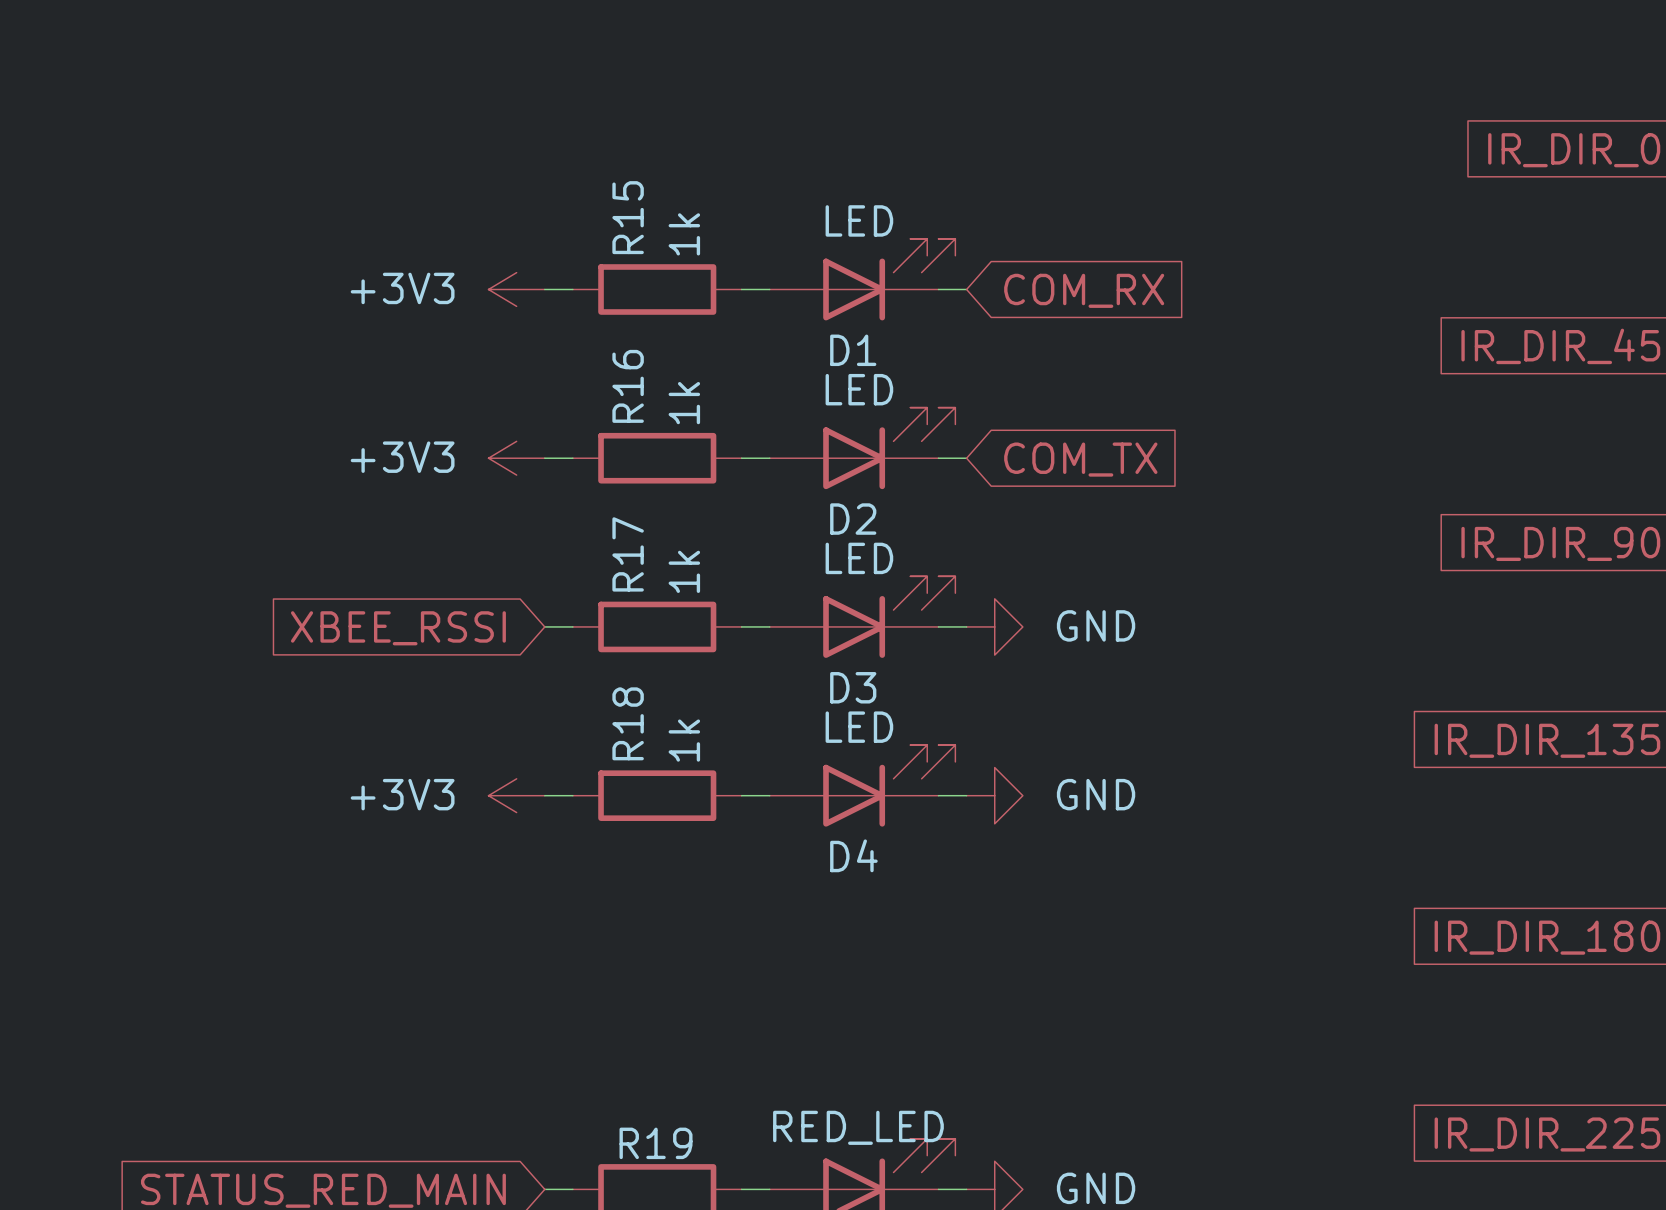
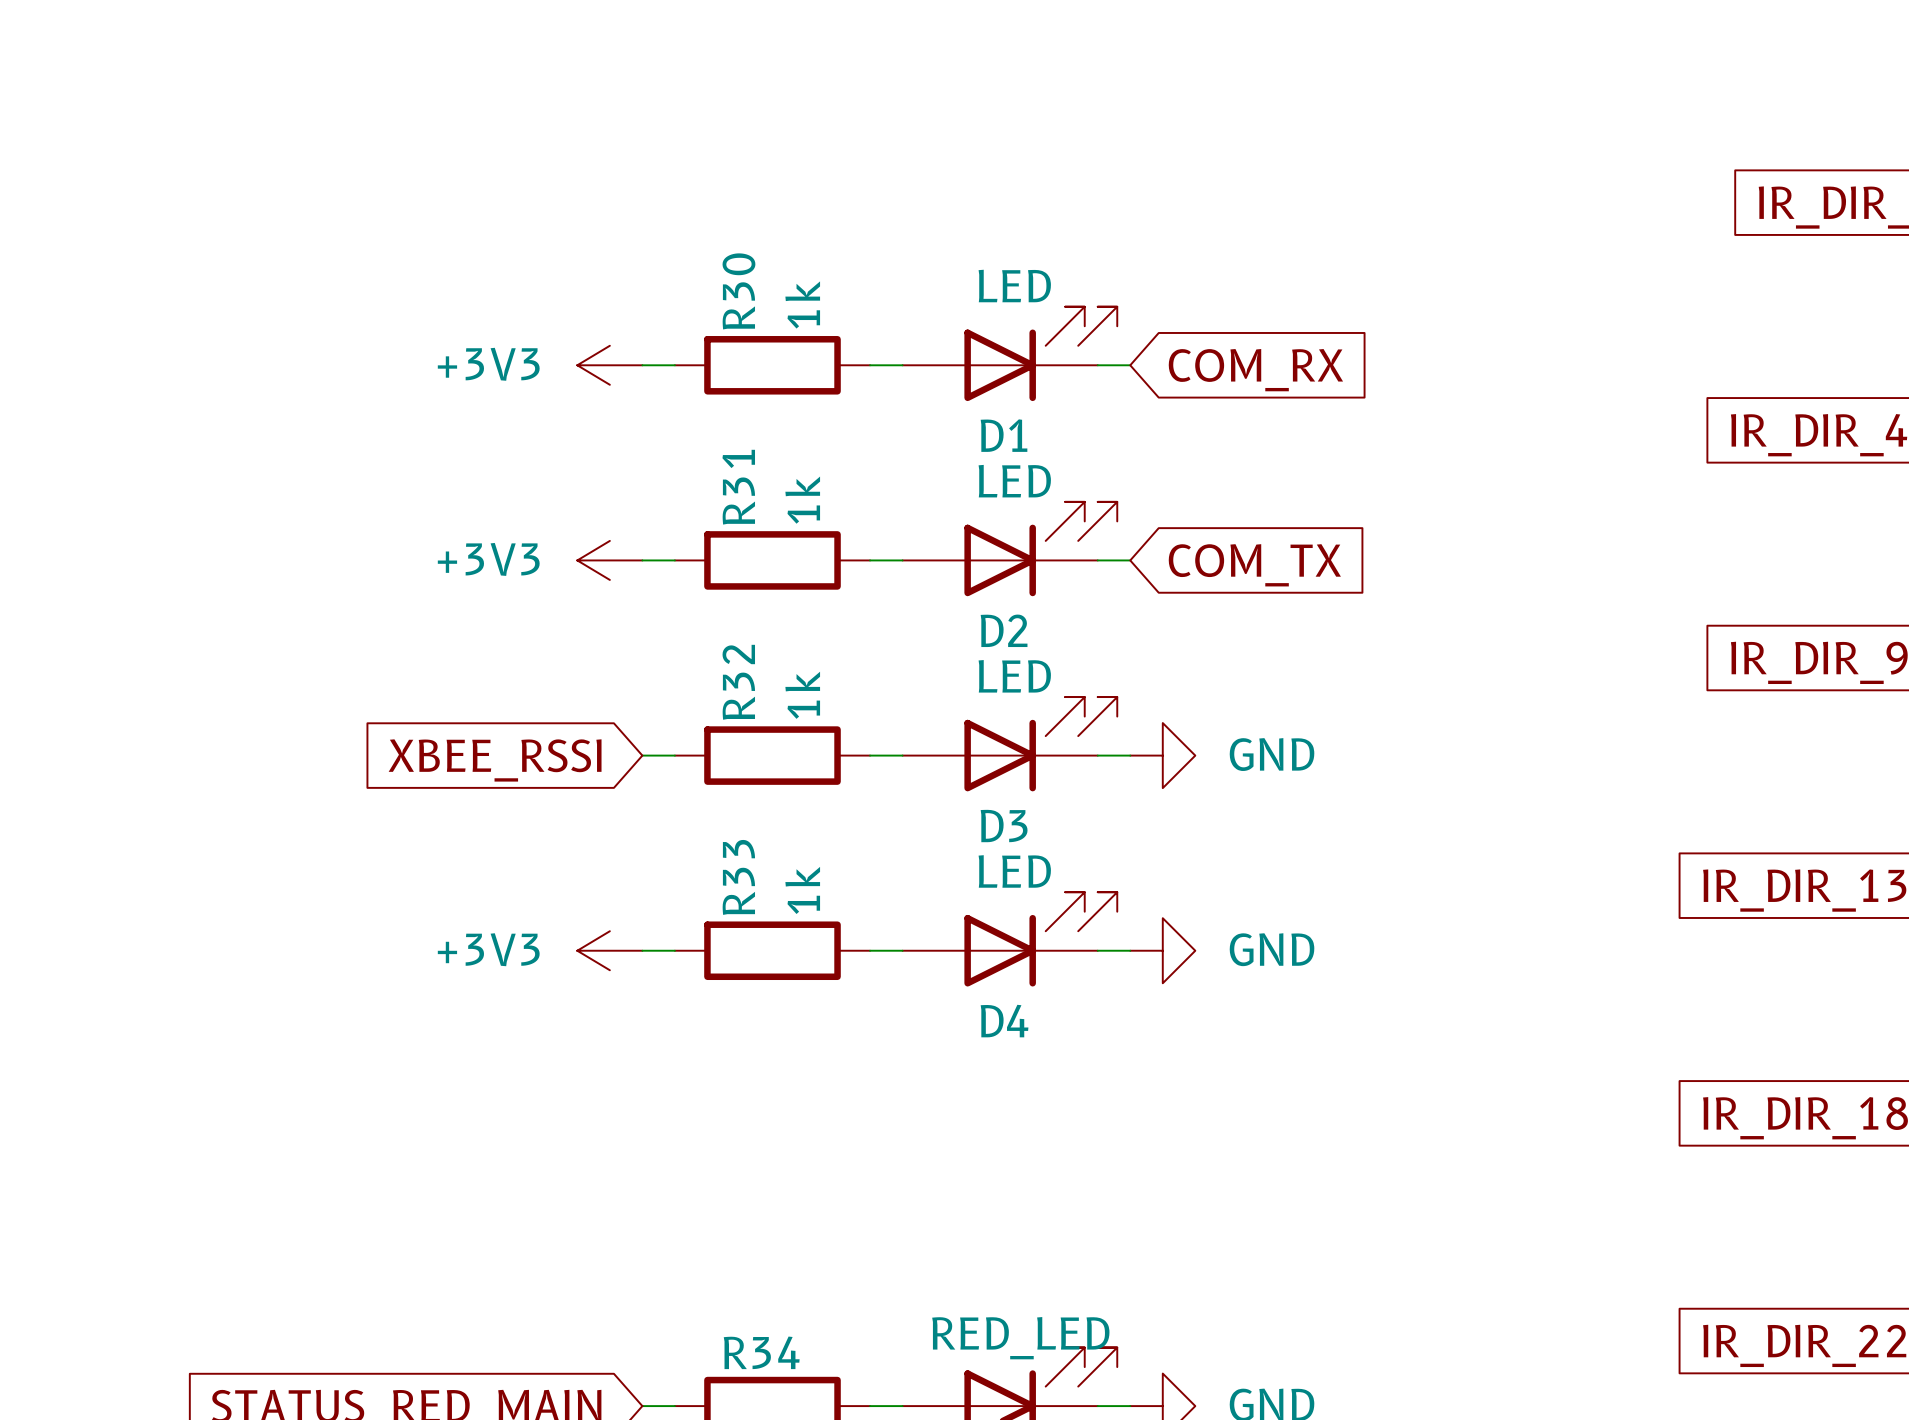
R15 name: R15 (628, 217) -> R30 (738, 291)
R16 name: R16 (628, 386) -> R31 (738, 487)
R17 name: R17 (628, 554) -> R32 (738, 682)
R18 name: R18 (628, 723) -> R33 (738, 877)
R19 name: R19 (656, 1143) -> R34 (761, 1352)

